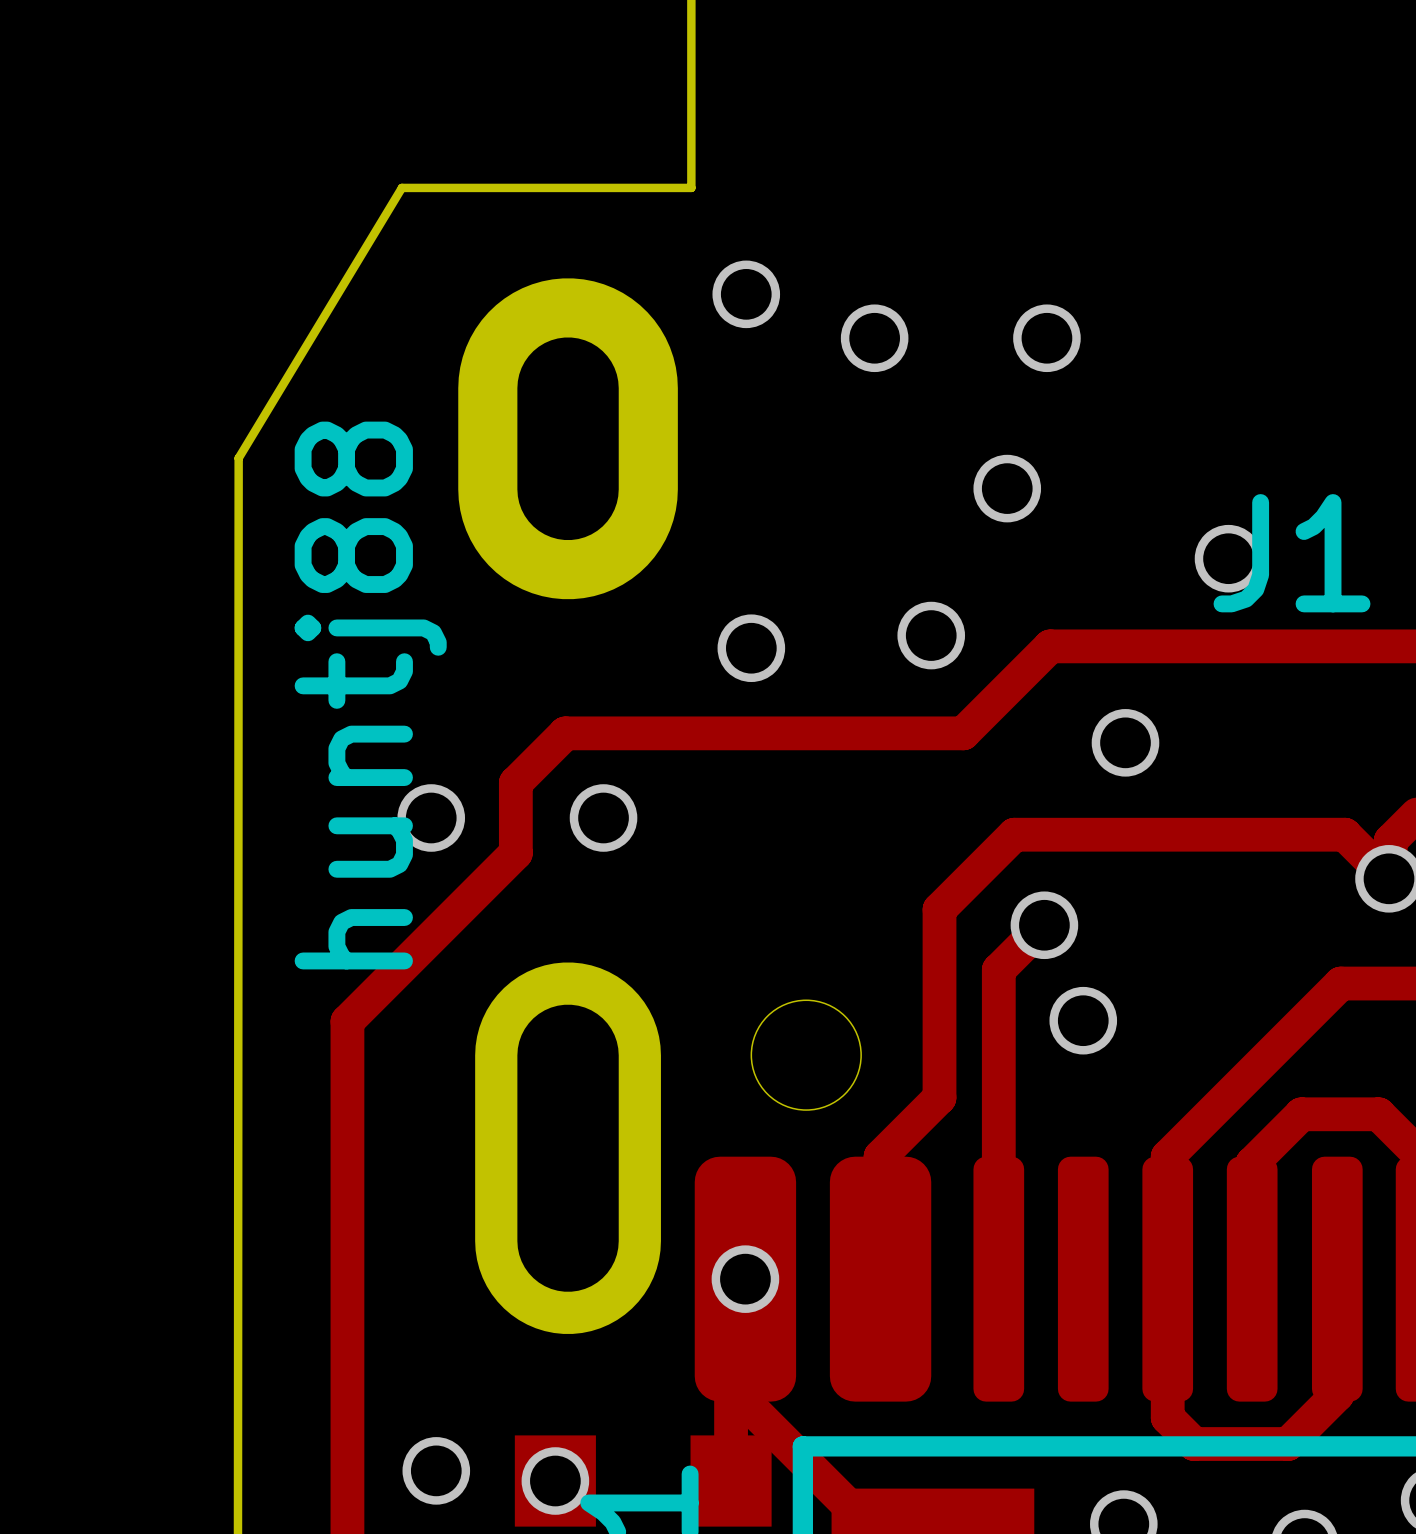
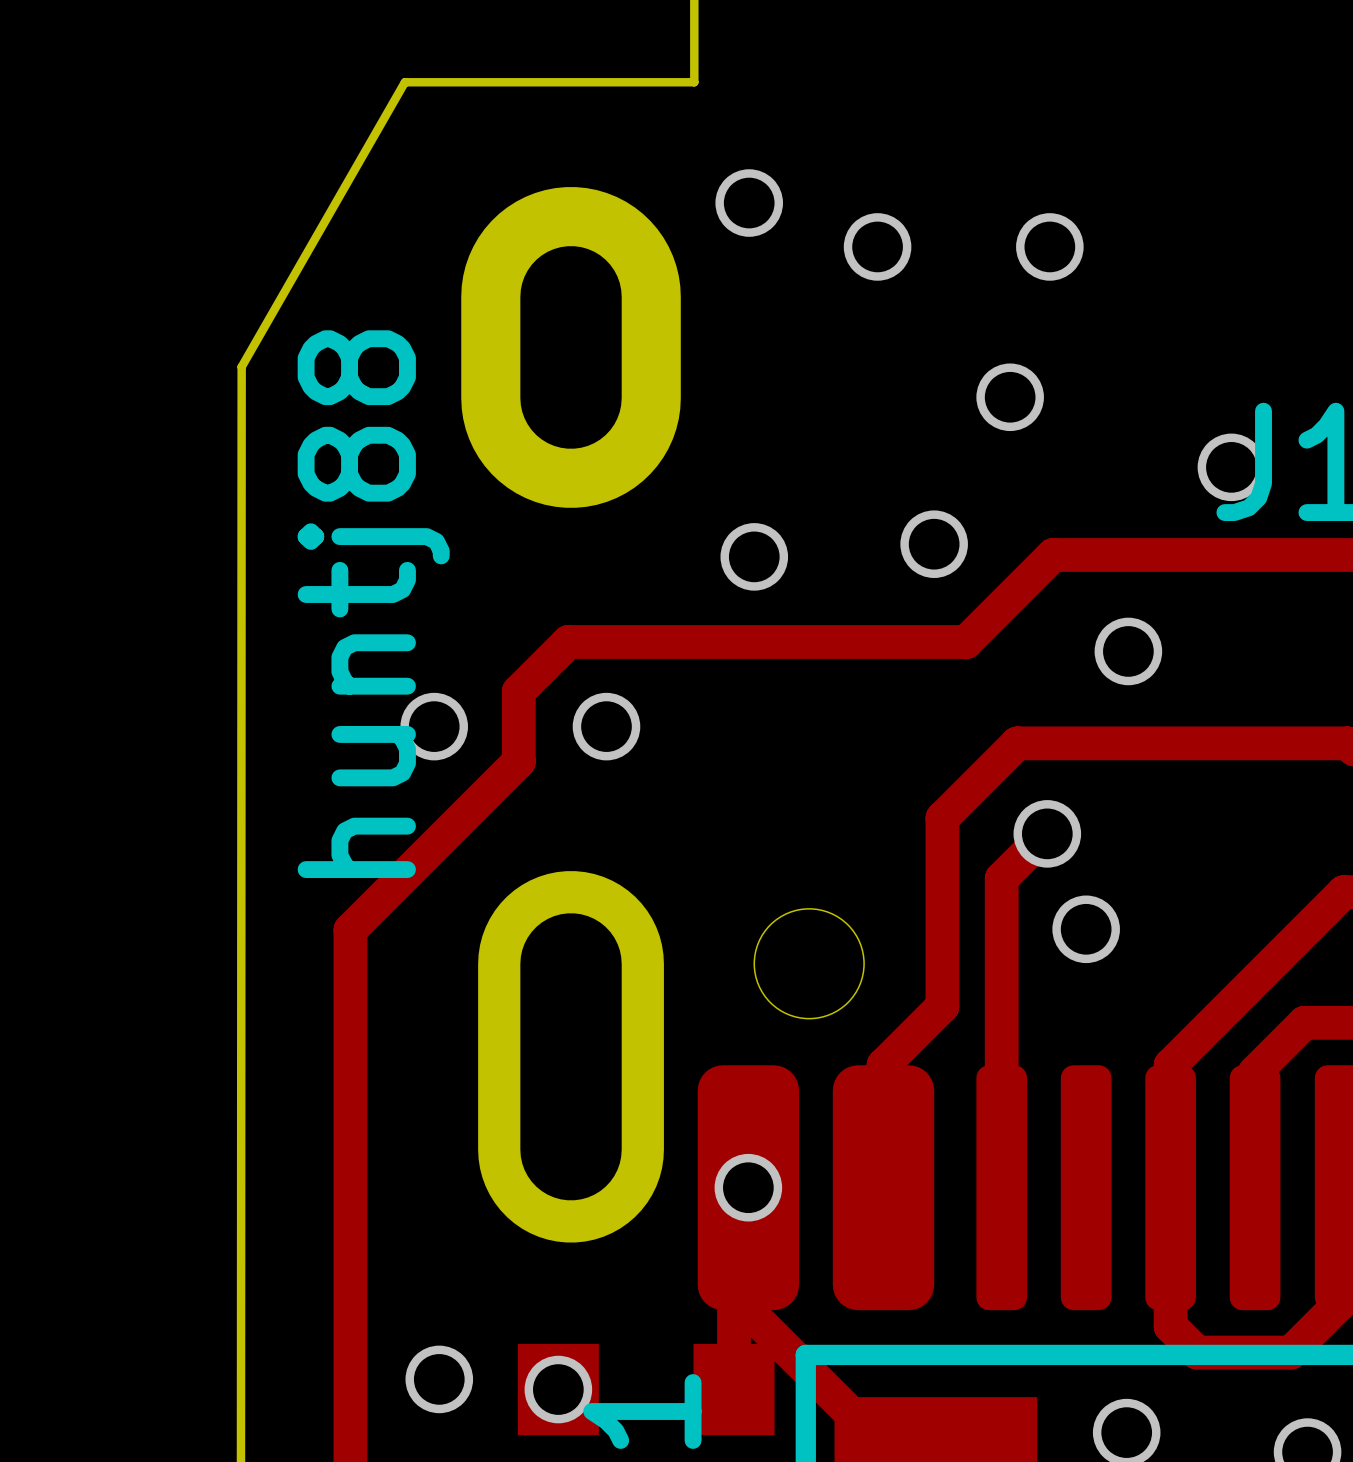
board edge: (691, 173) (691, 187) (401, 187) (238, 458) -> (694, 82) (404, 82) (241, 366)

